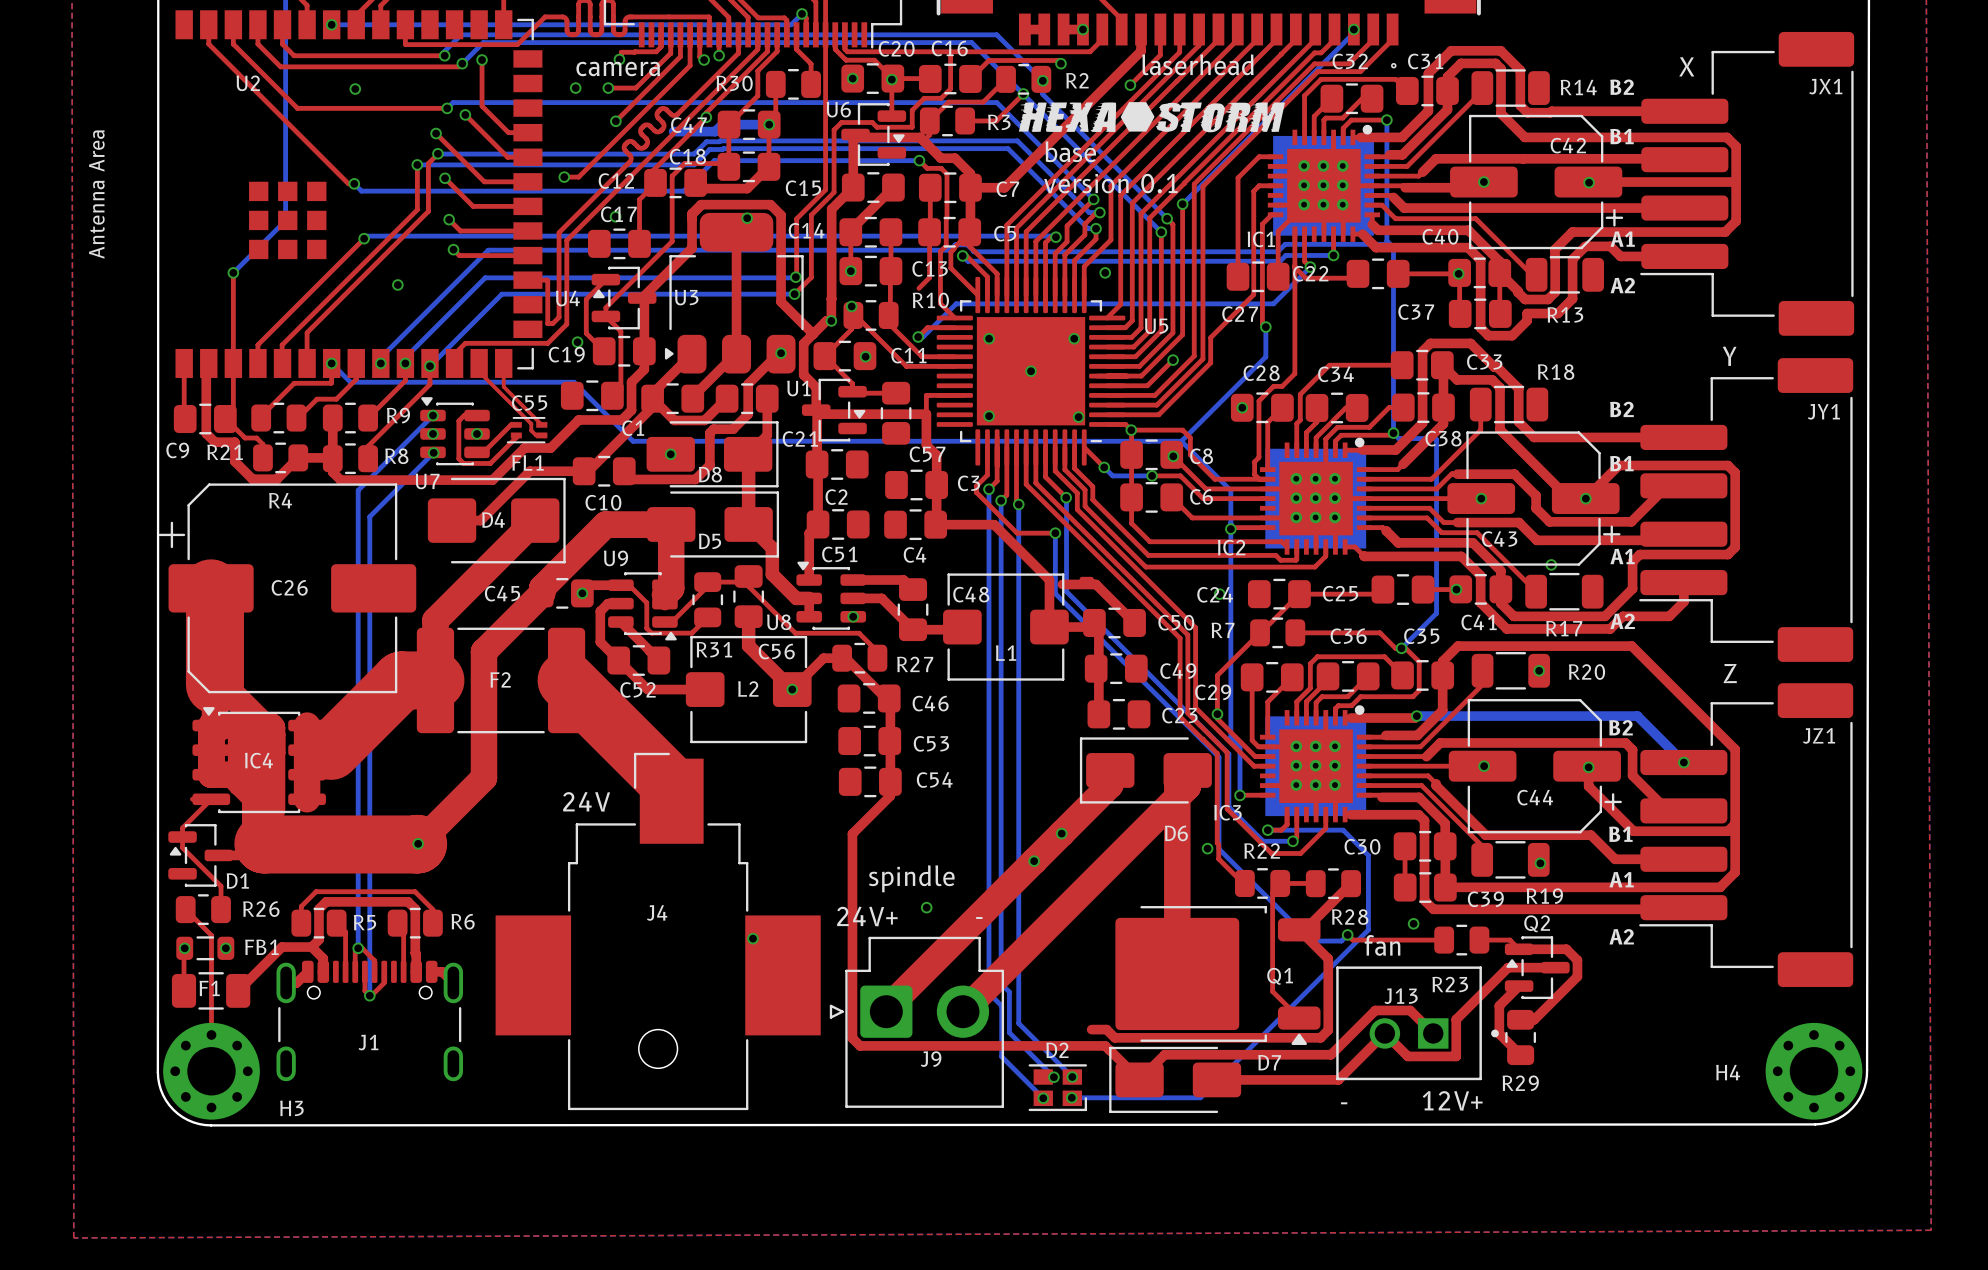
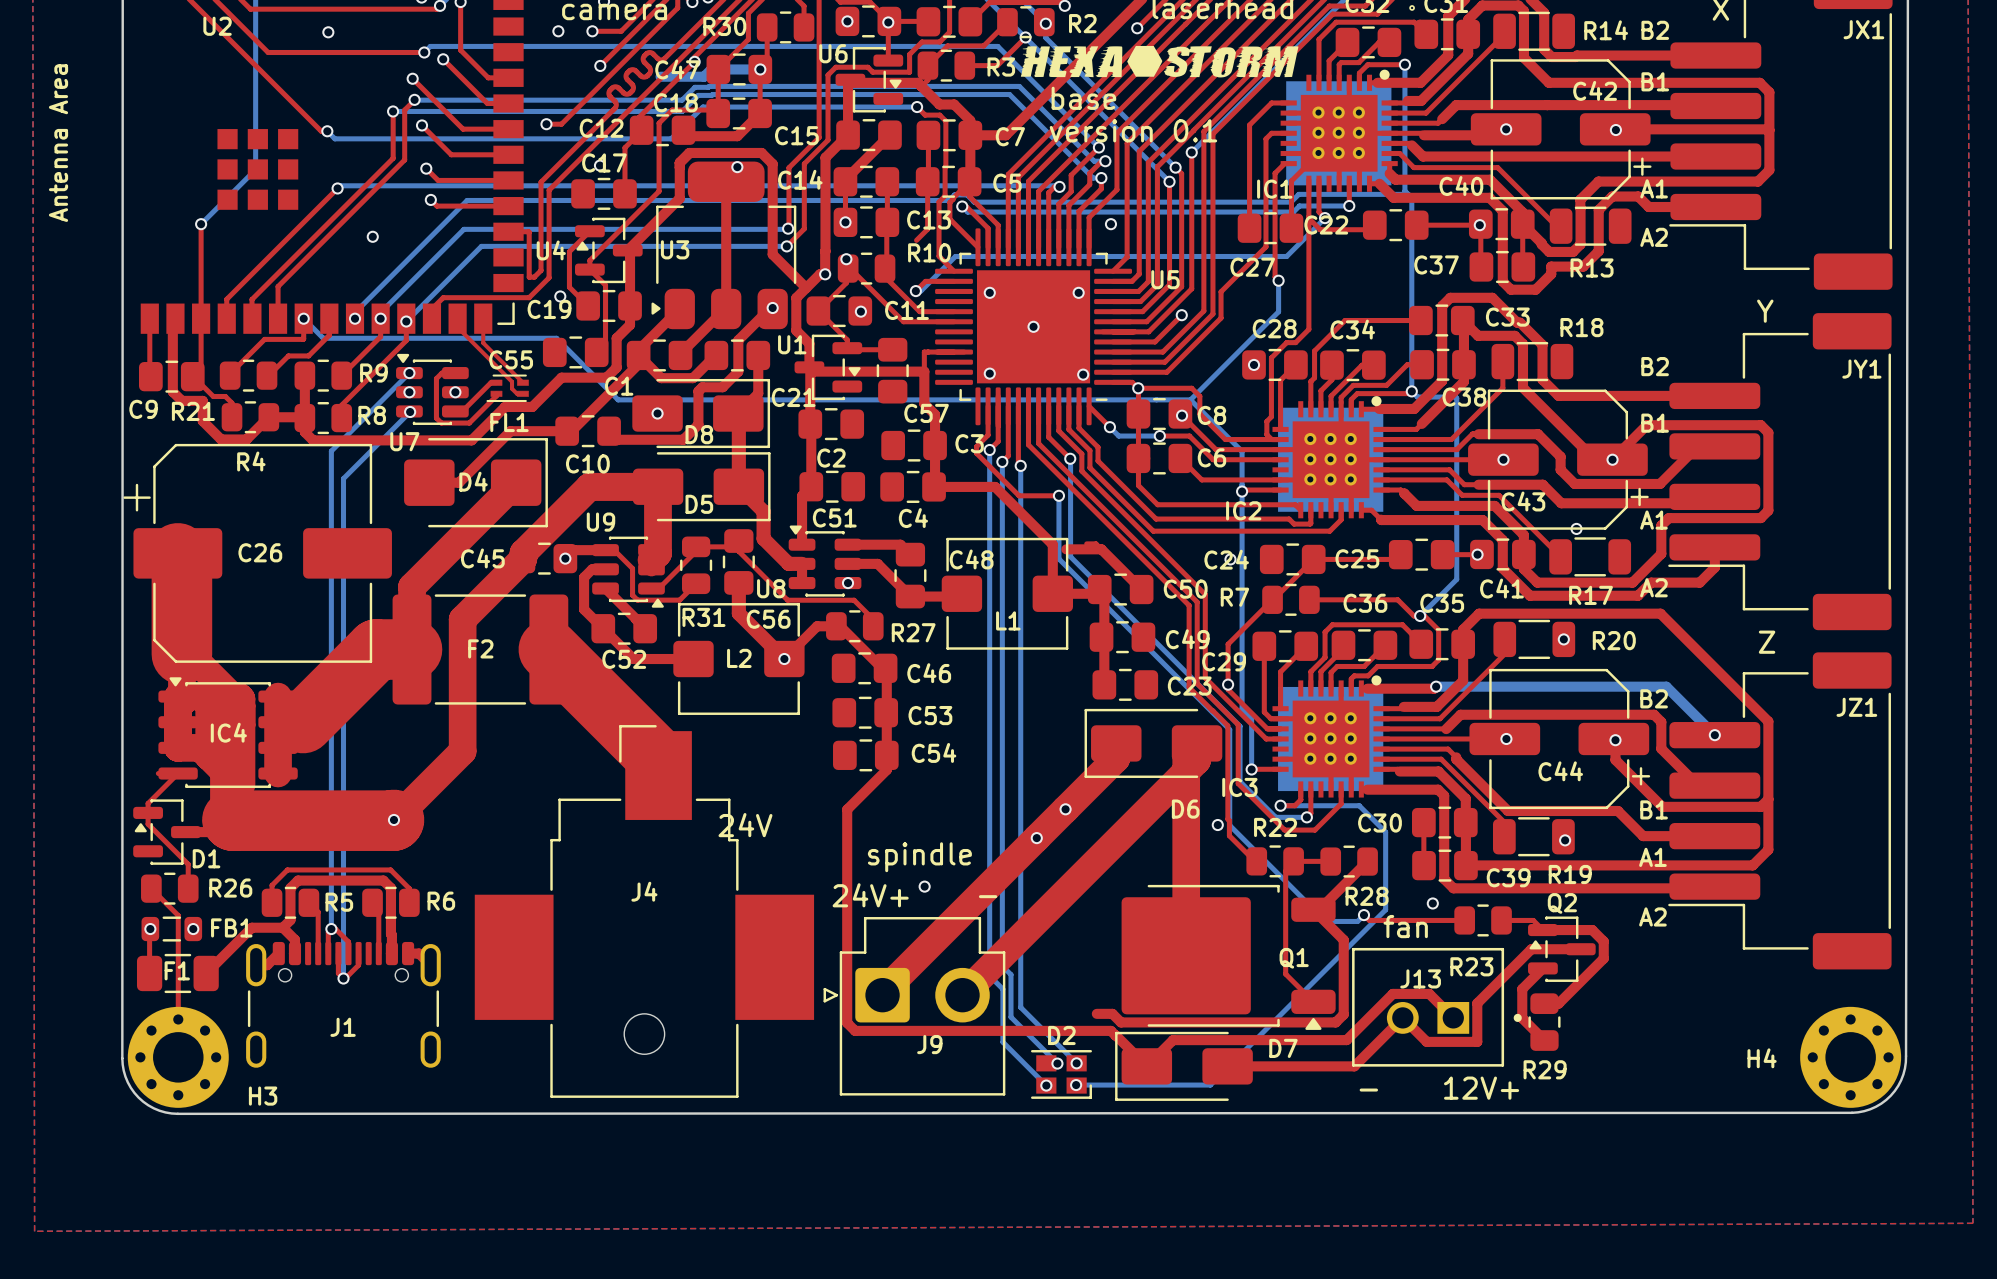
text position: 24V (586, 801) -> 24V (745, 825)
via: (752, 938) -> none

